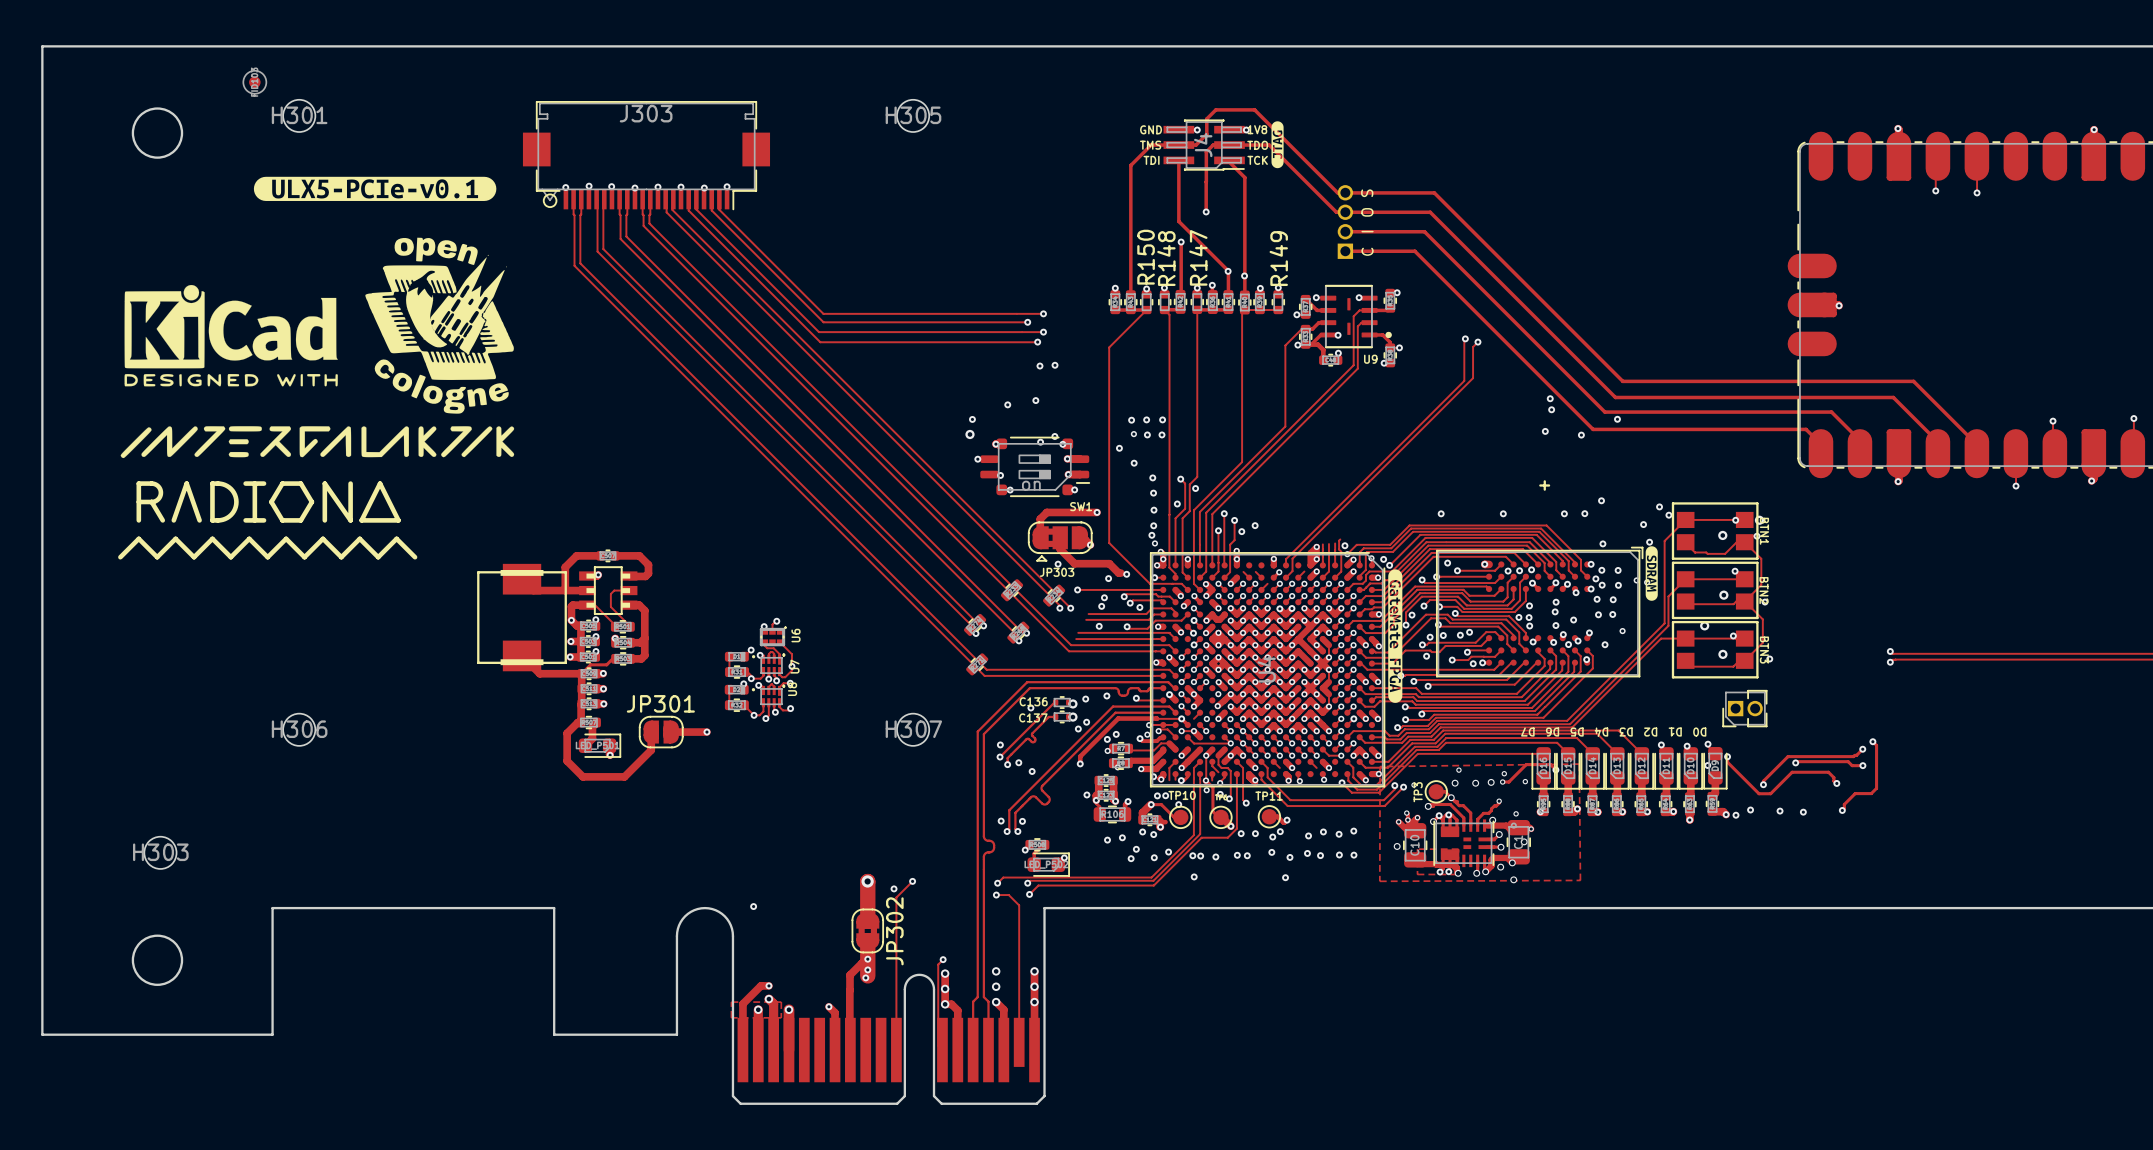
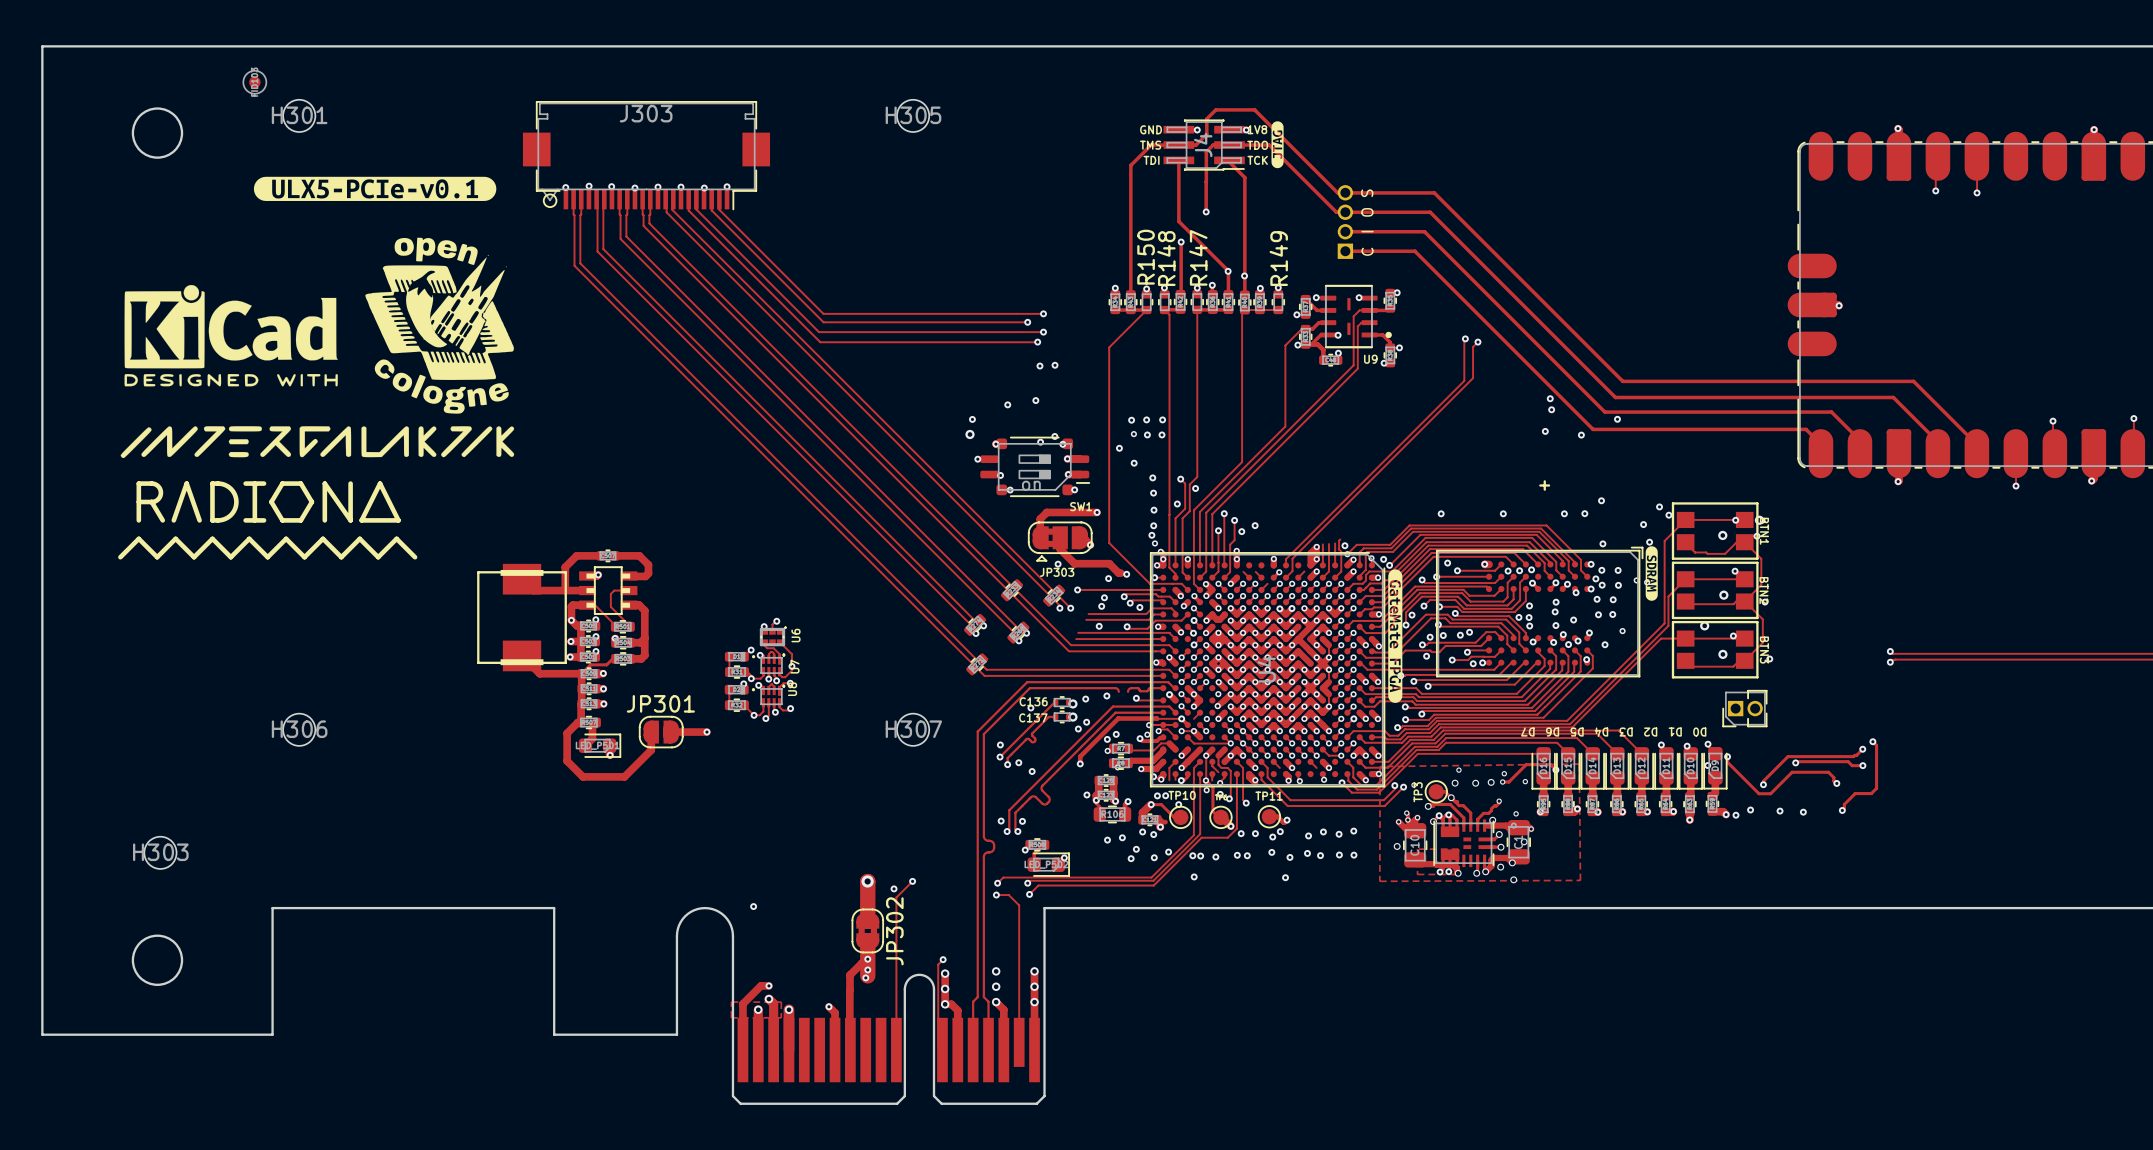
track: (1118, 692) (1122, 695) (1126, 695) (1128, 692) -> none

